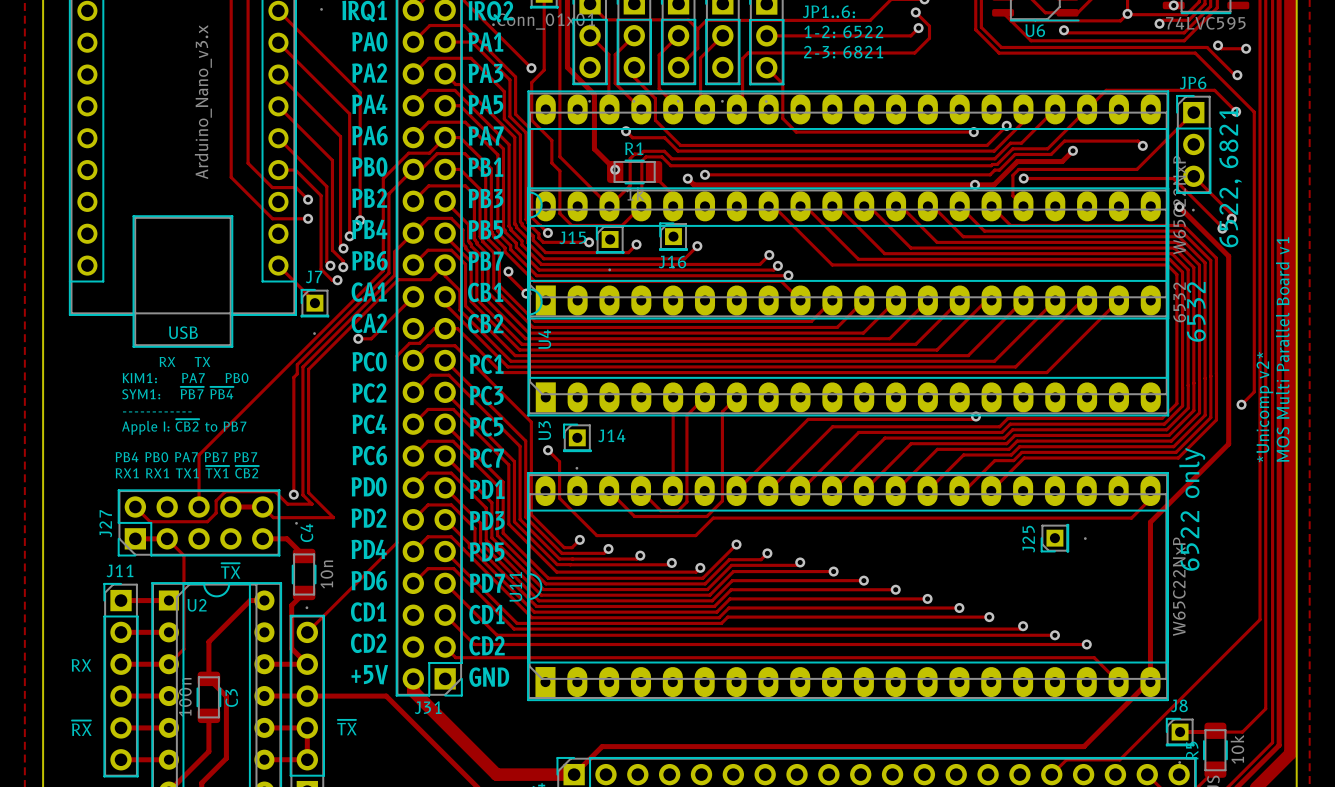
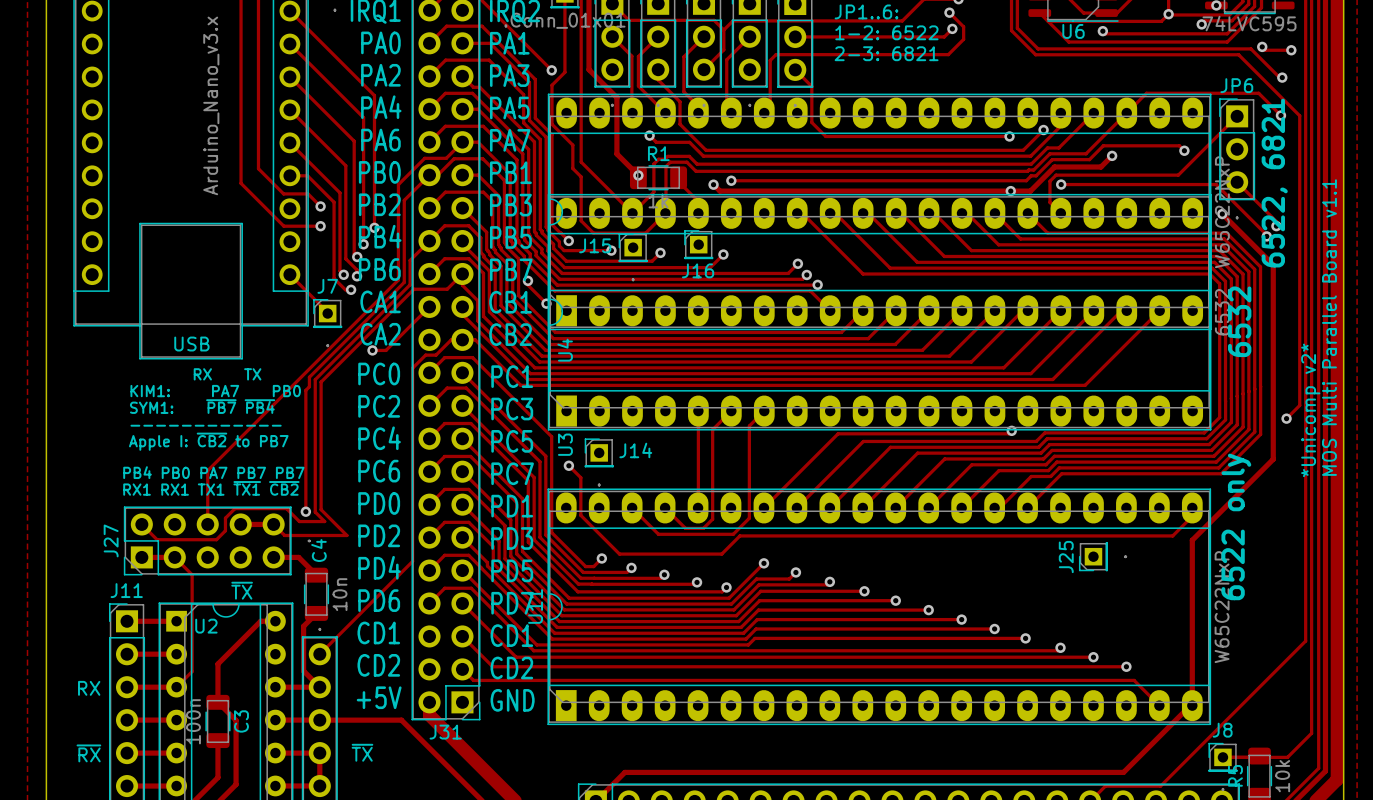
text: MOS Multi Parallel Board v1 (1282, 349) -> MOS Multi Parallel Board v1.1 (1329, 327)

